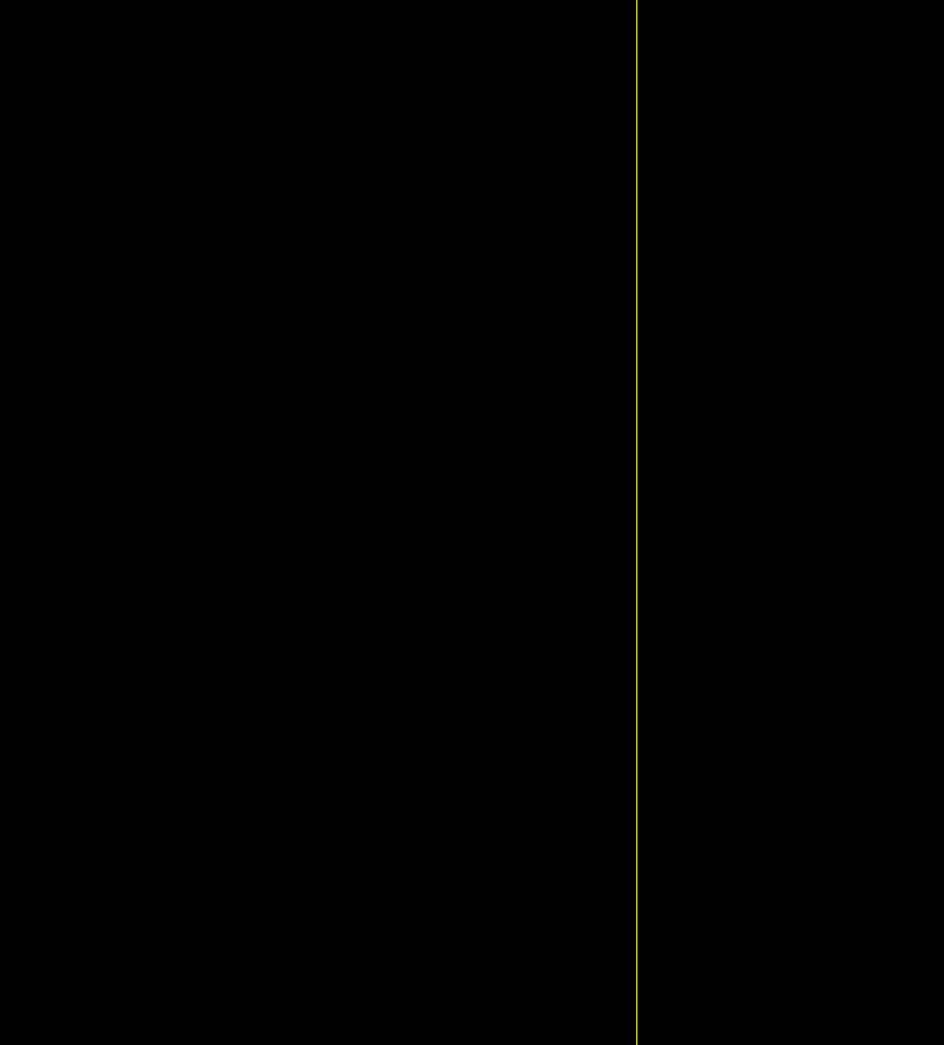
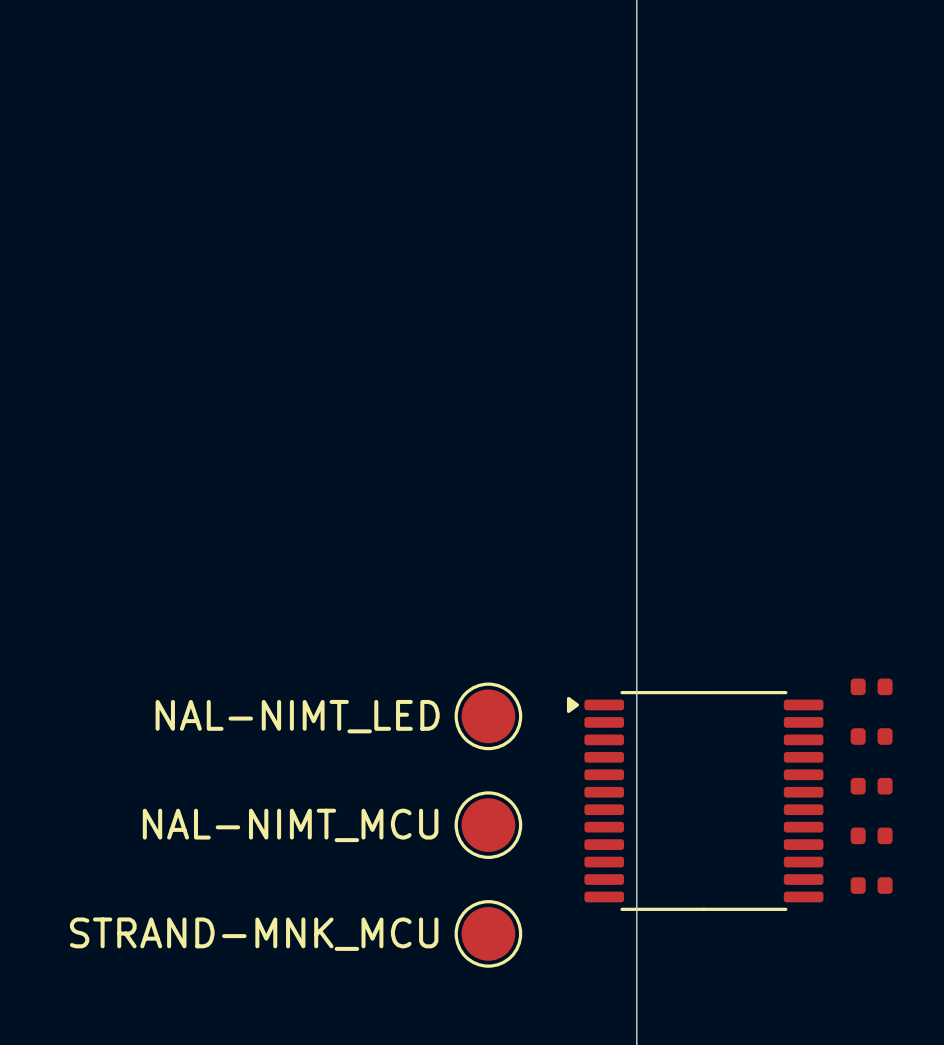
part: none -> (871, 686)
part: none -> NAL-NIMT_LED (488, 716)
part: none -> (871, 736)
part: none -> (871, 786)
part: none -> (695, 800)
part: none -> NAL-NIMT_MCU (488, 825)
part: none -> (871, 835)
part: none -> (871, 885)
part: none -> STRAND-MNK_MCU (488, 933)

